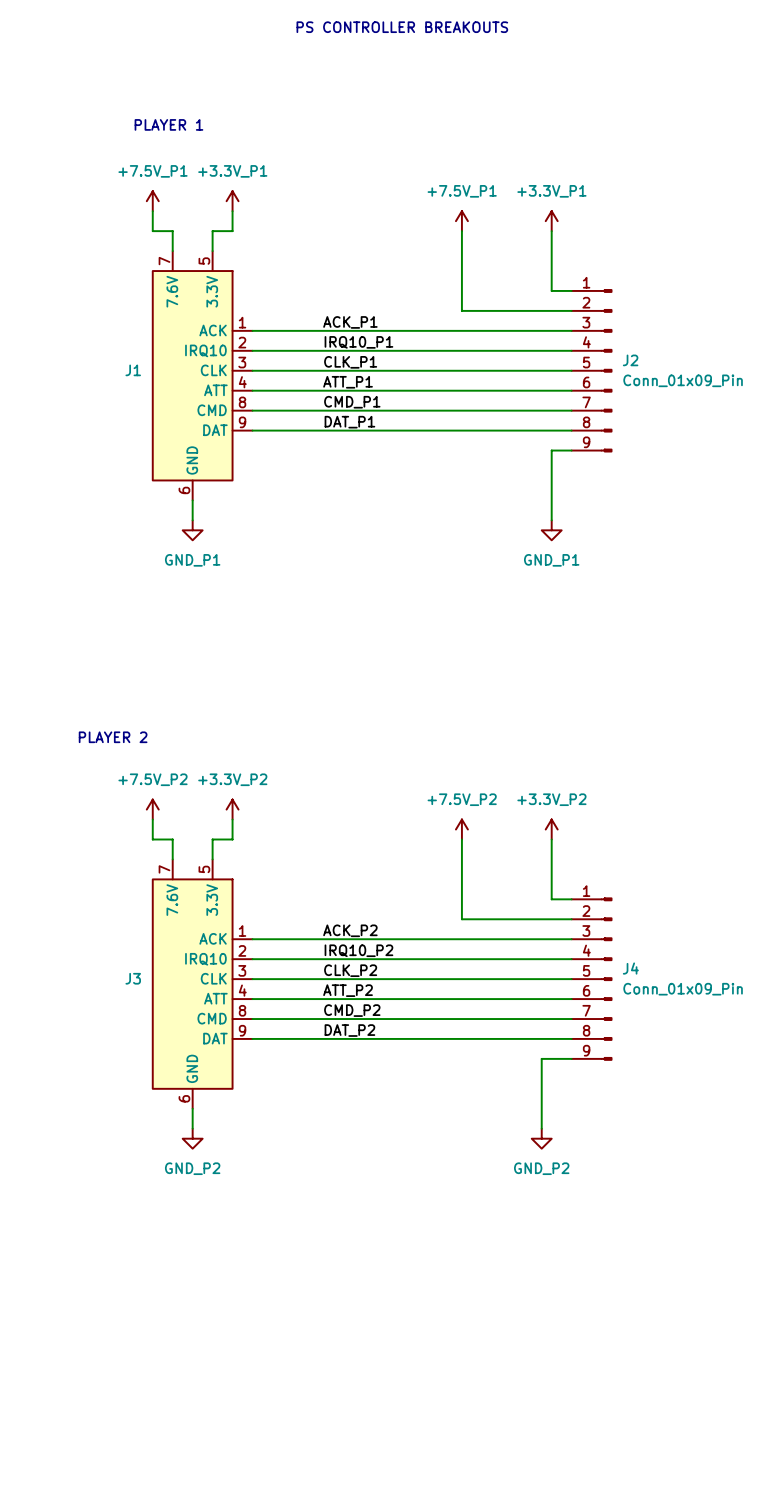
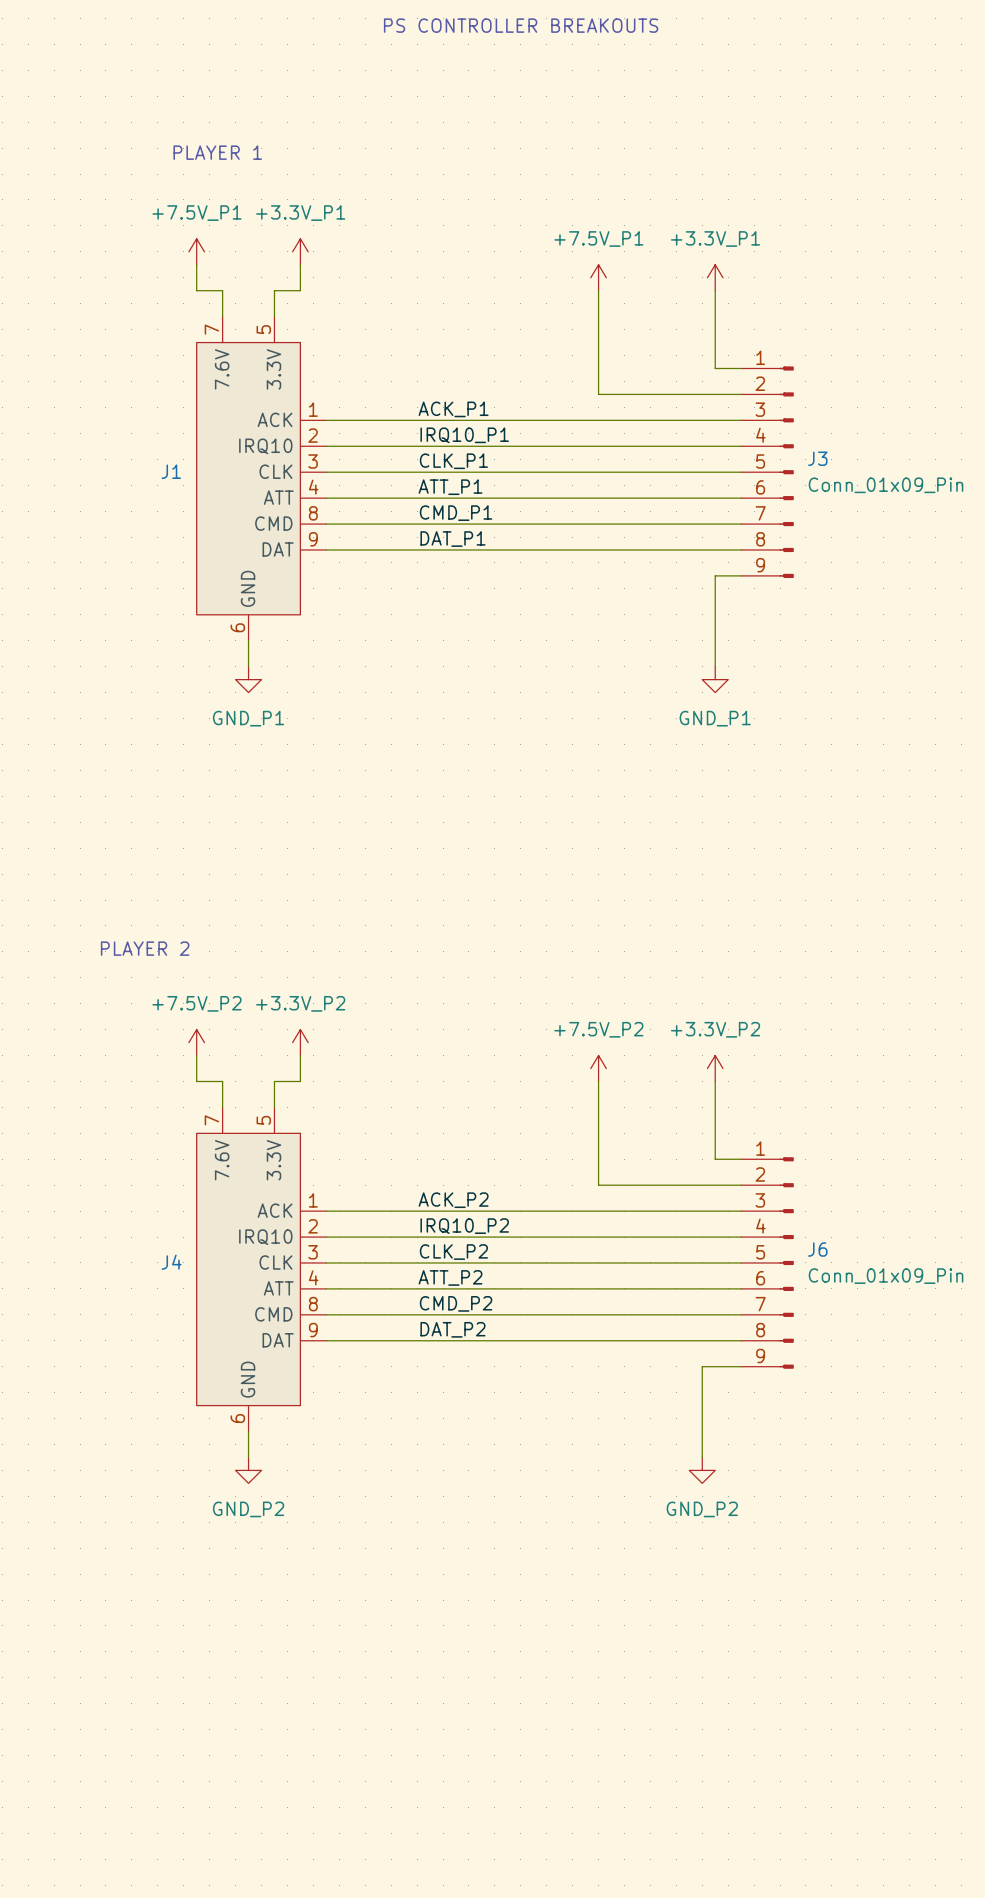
J2 name: J2 (630, 360) -> J3 (817, 458)
J4 name: J4 (630, 968) -> J6 (817, 1249)
J3 name: J3 (133, 978) -> J4 (171, 1262)

